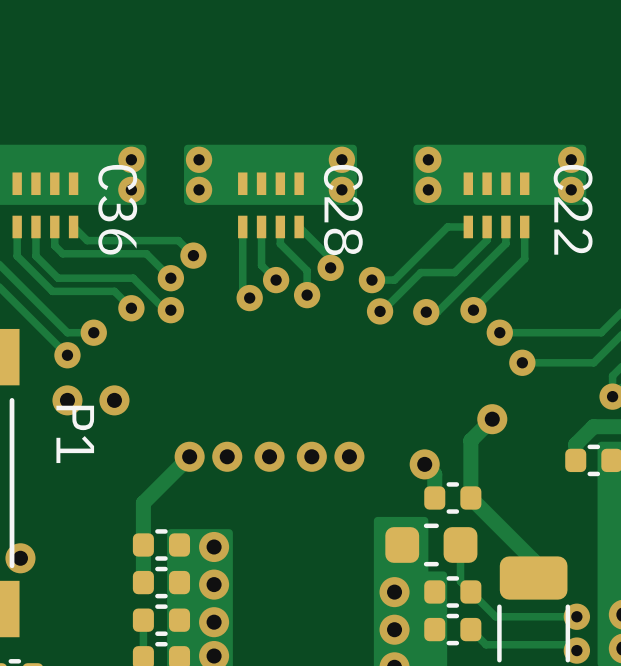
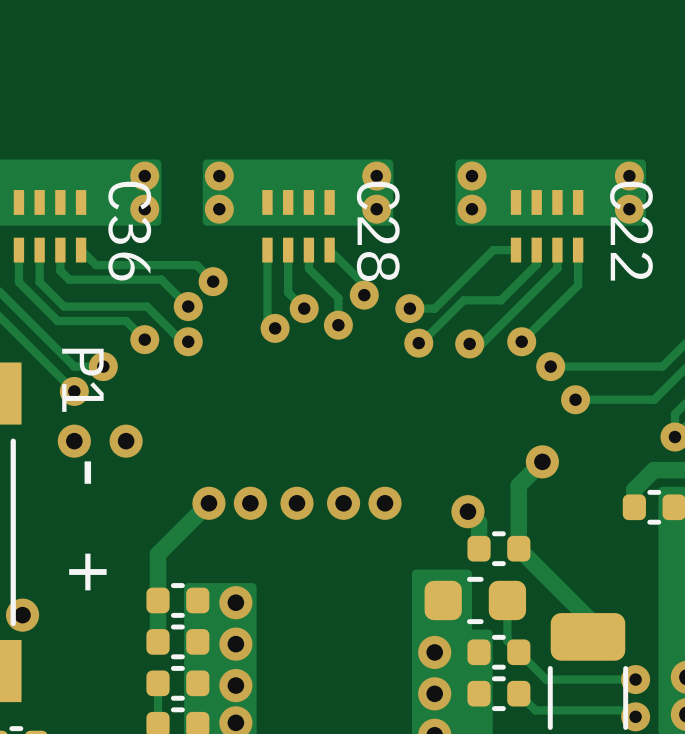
text: none -> - (87, 472)
P1 name position: P1 (75, 434) -> P1 (82, 380)
text: none -> + (87, 572)

